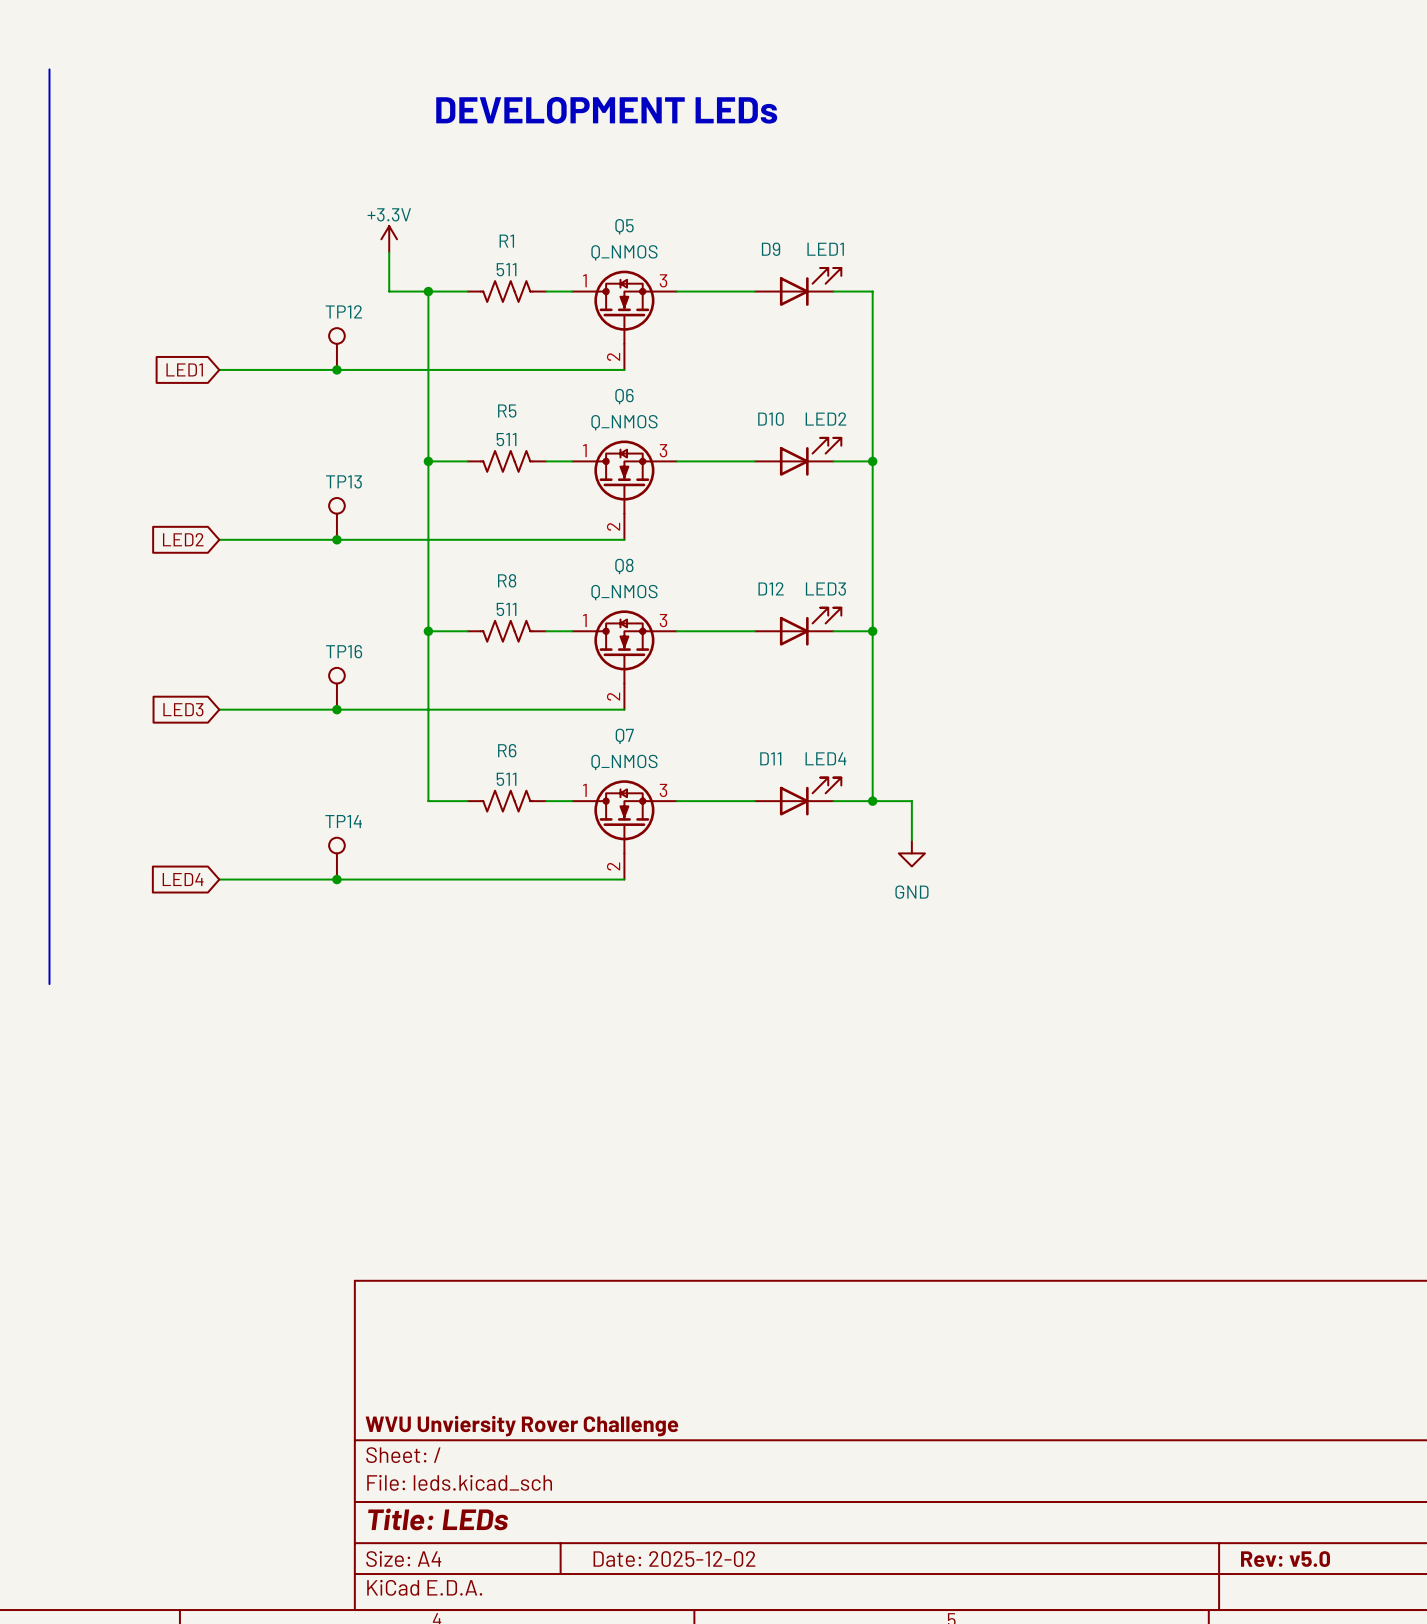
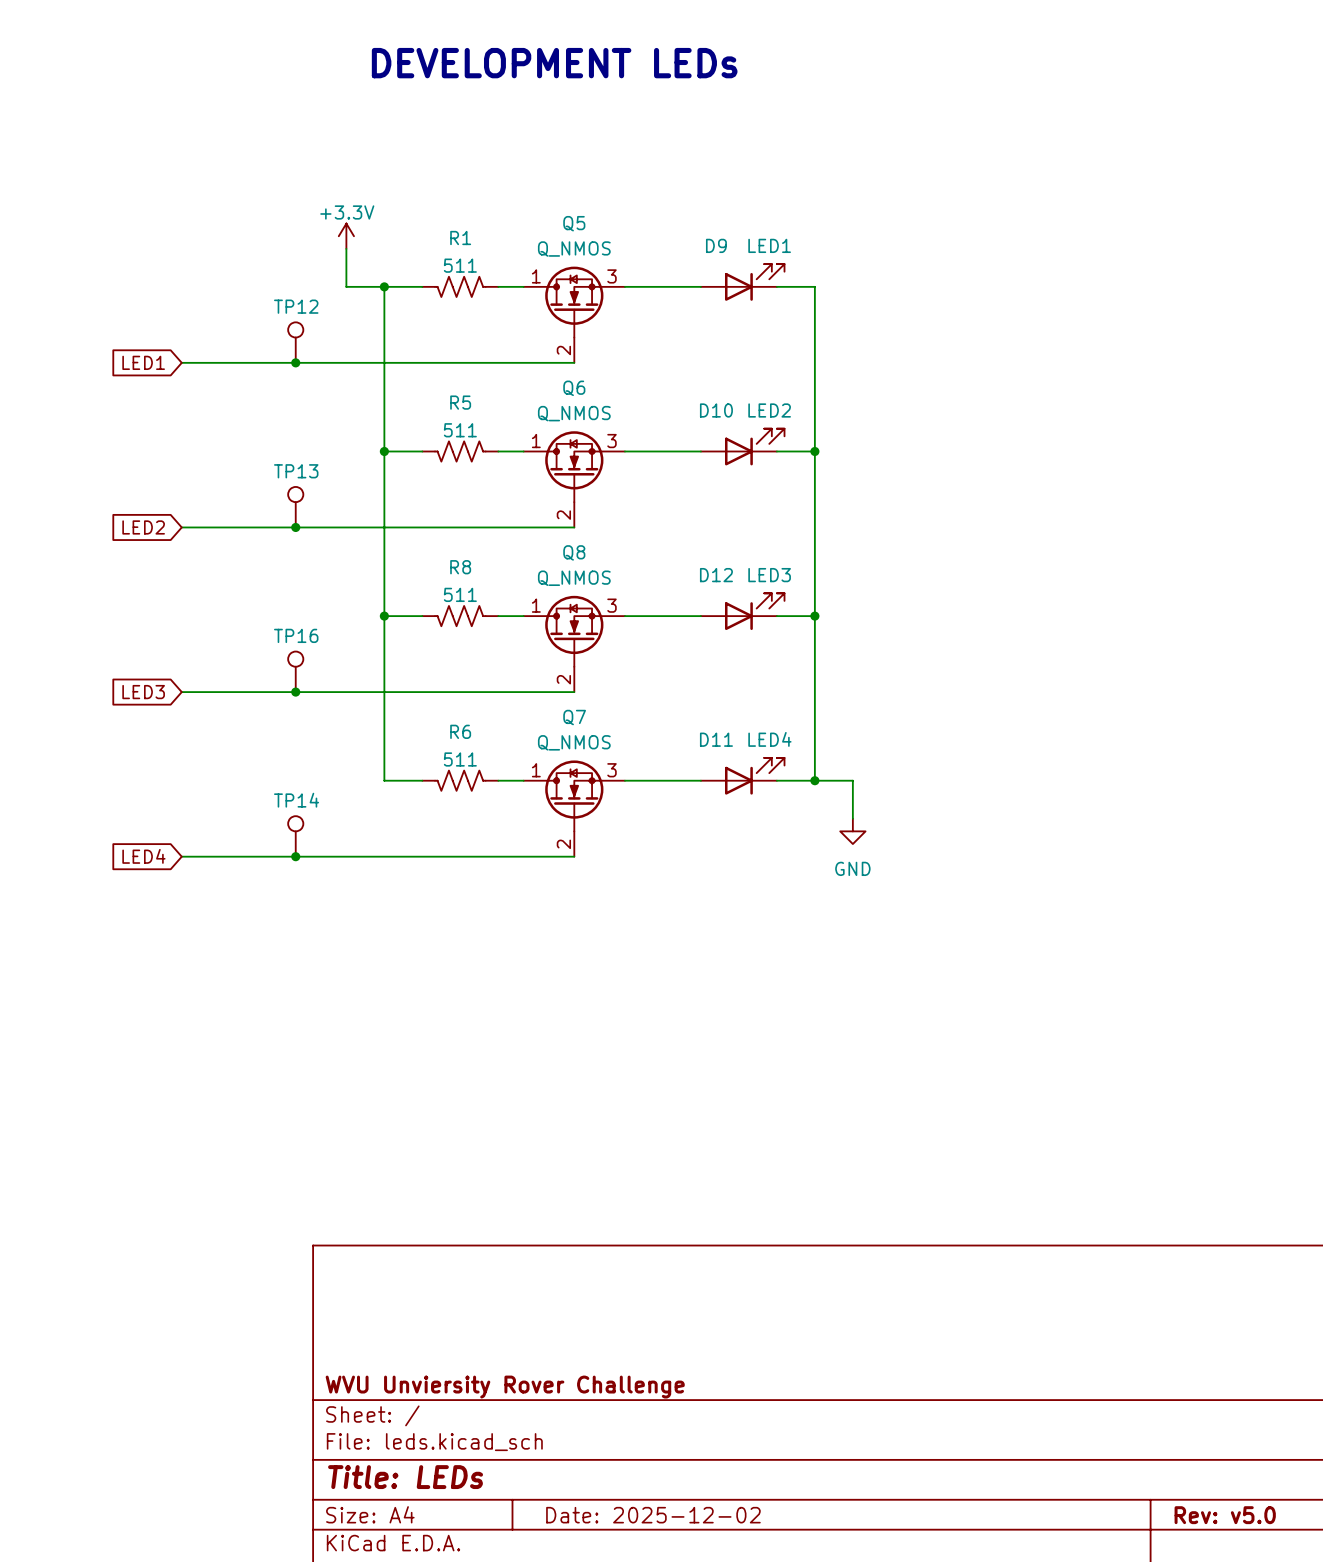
line: (49, 69) (49, 984) -> none
text position: DEVELOPMENT LEDs (606, 110) -> DEVELOPMENT LEDs (554, 63)

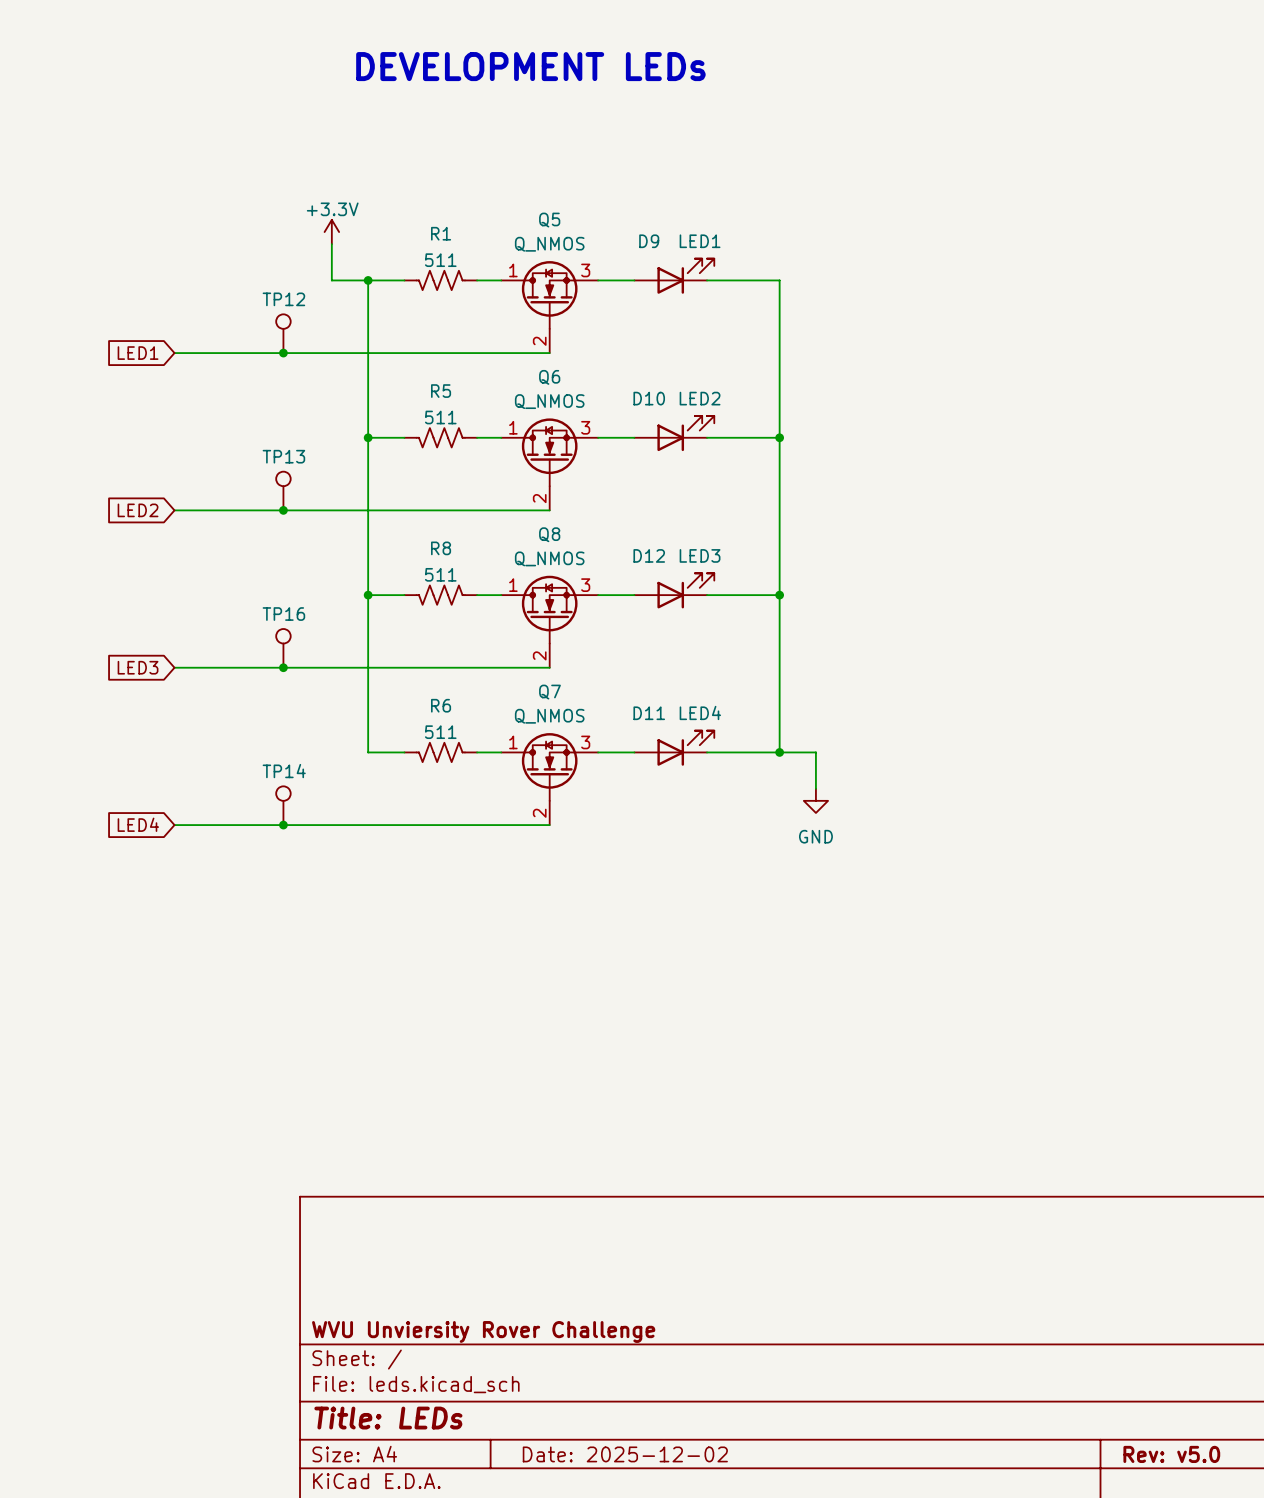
D9 position: (742, 282) -> (674, 276)
D10 position: (742, 447) -> (674, 433)
D12 position: (742, 611) -> (674, 590)
D11 position: (742, 776) -> (674, 748)

